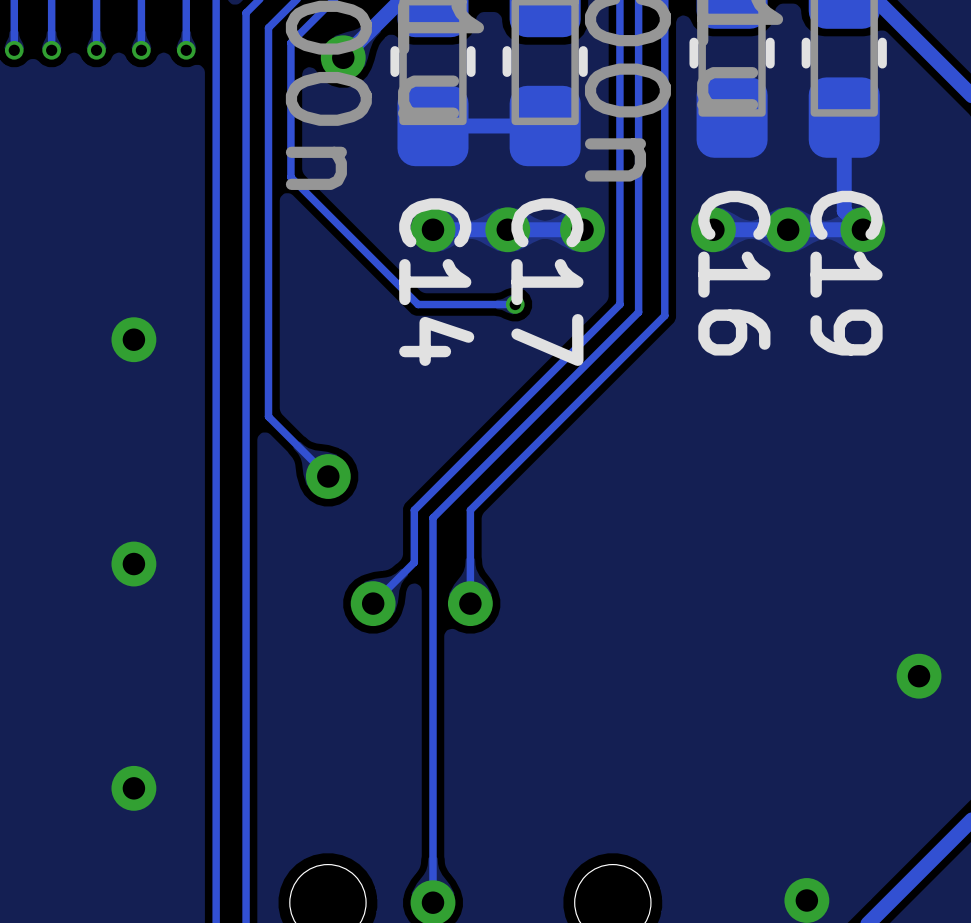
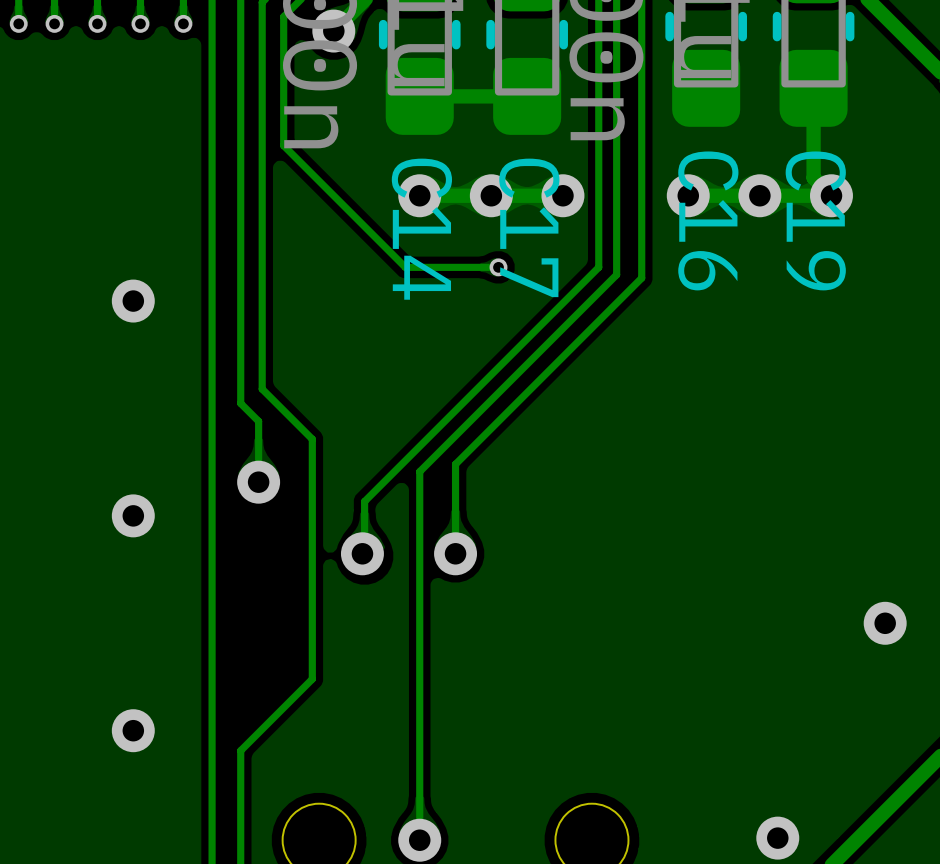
track: (268, 416) (328, 476) -> none
track: (246, 446) (246, 809) -> (262, 374) (262, 389) (312, 439) (312, 679) (240, 750)
track: none -> (240, 403) (258, 421) (258, 482)
via position: (328, 476) -> (258, 482)
track: (414, 510) (414, 562) (373, 603) -> (401, 464) (364, 501) (364, 555)

